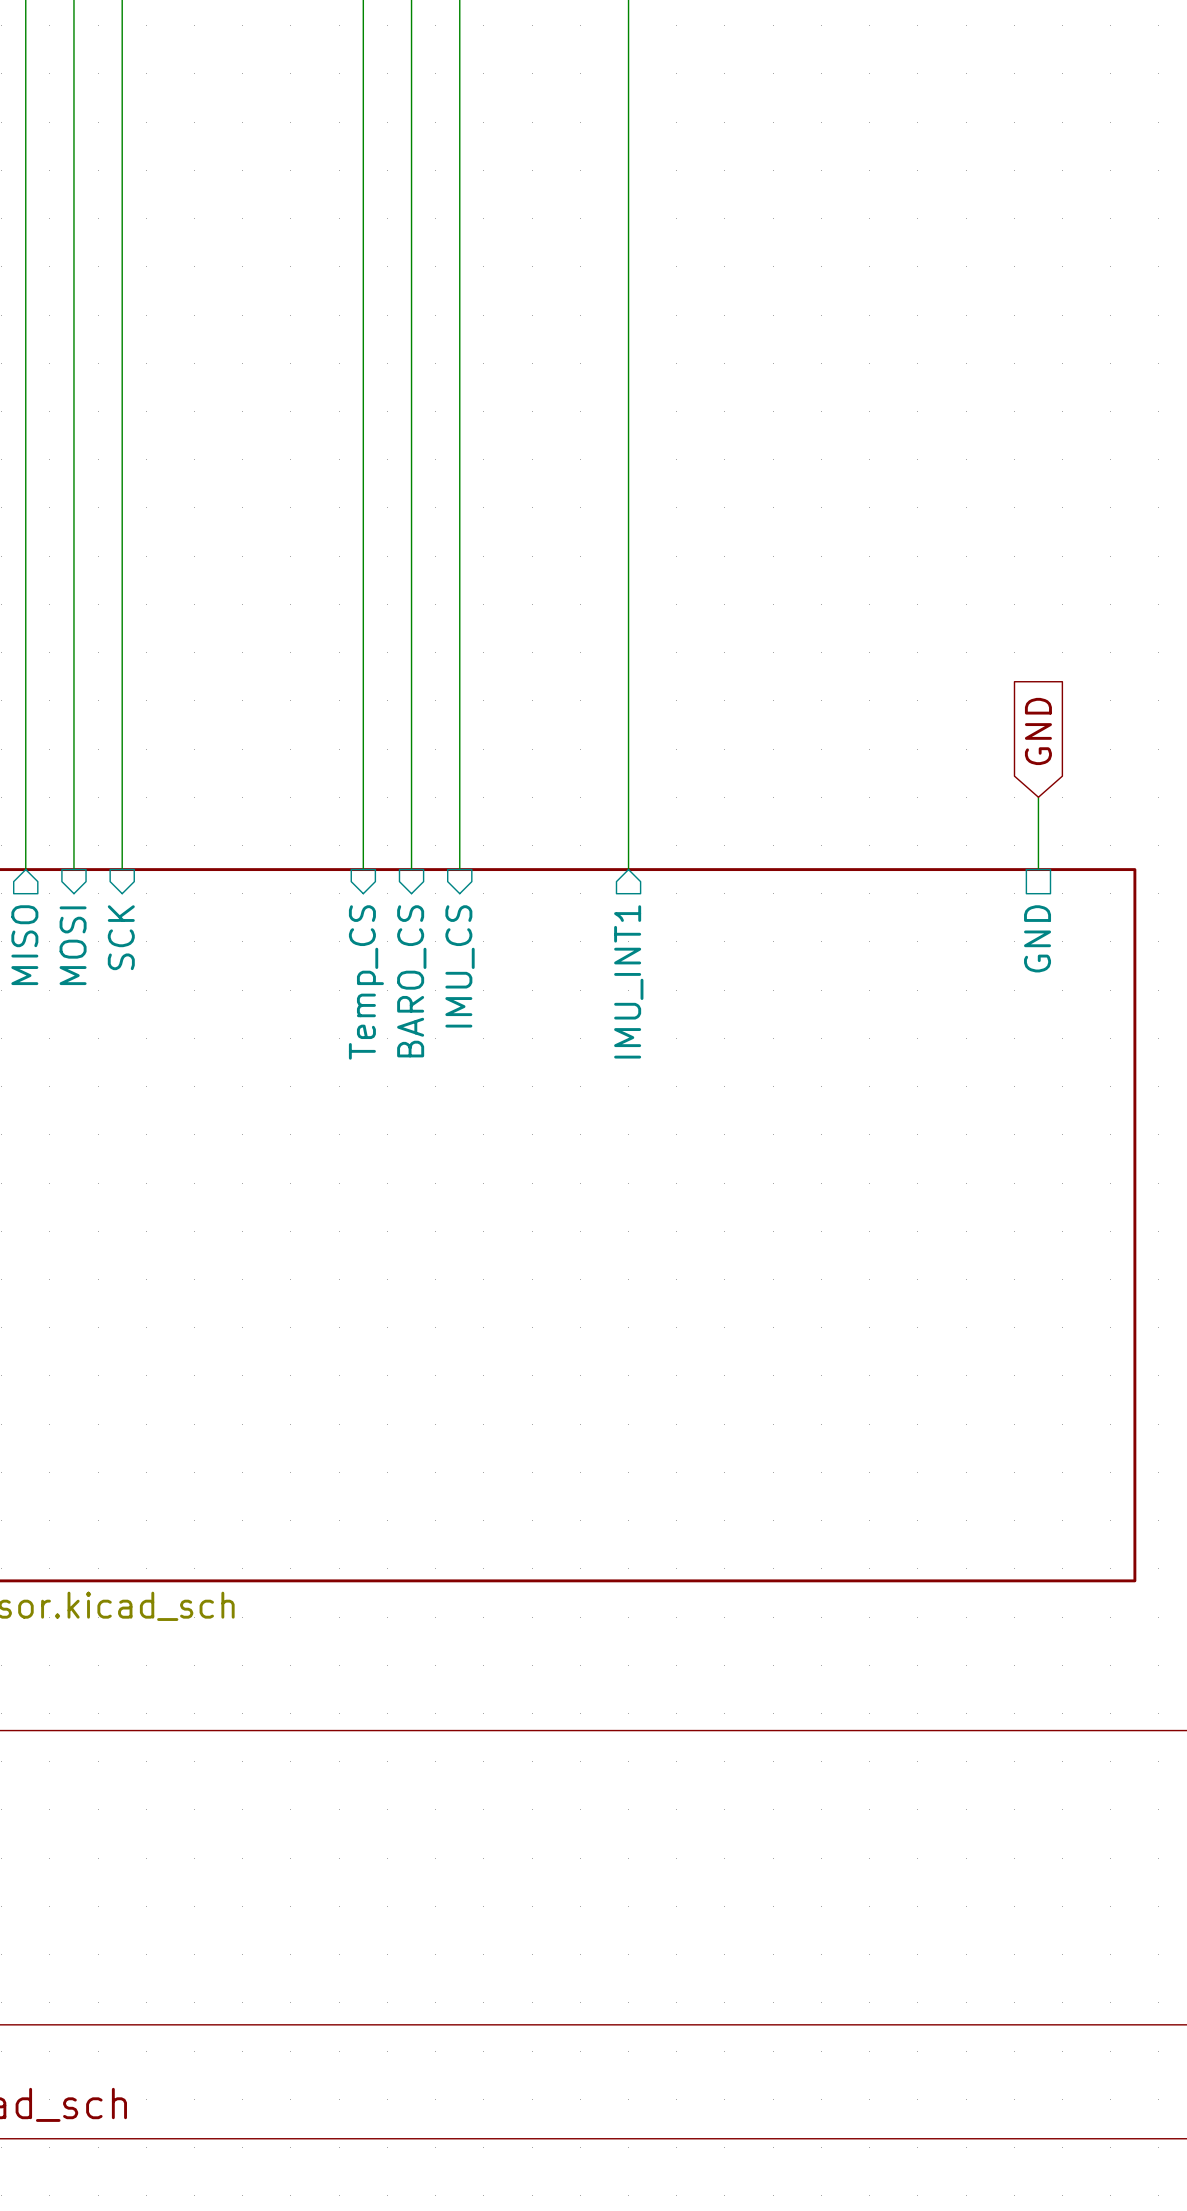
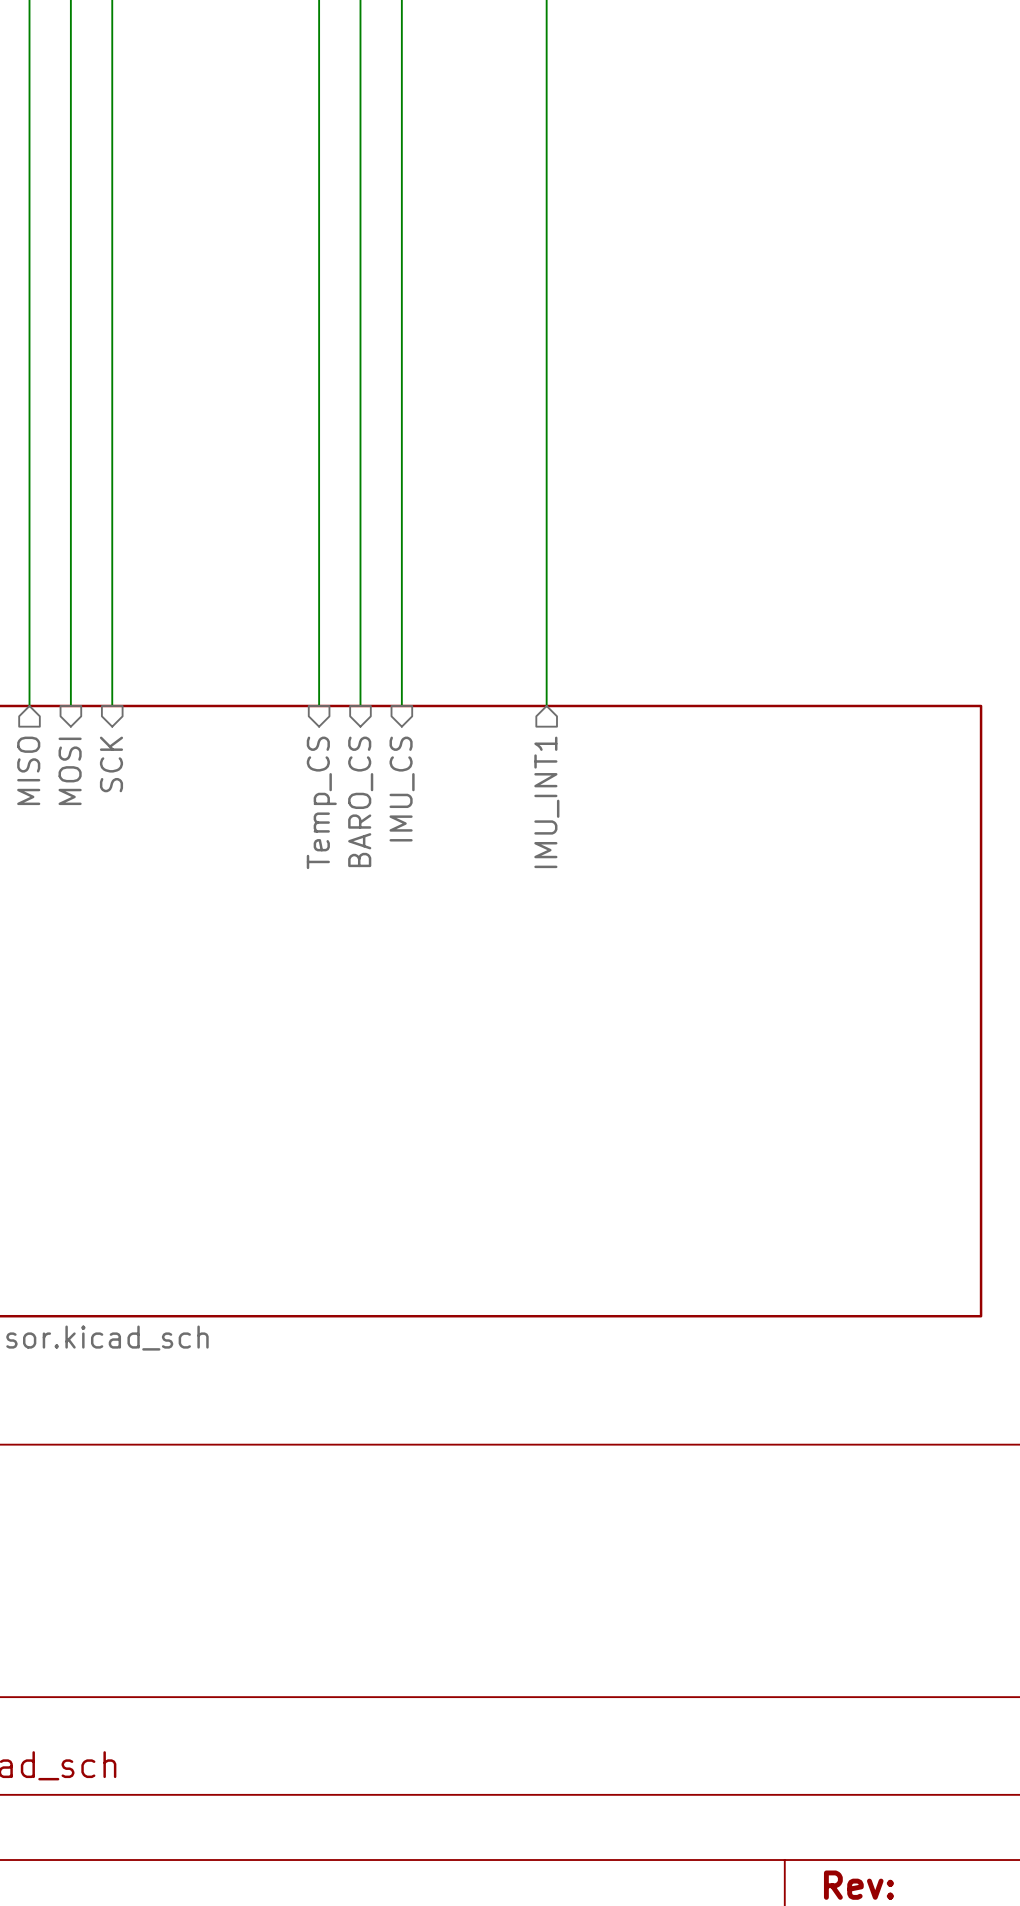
global label: GND (1038, 731) -> none
wire: (1038, 797) (1038, 869) -> none
sheet pin: GND (1037, 938) -> none

